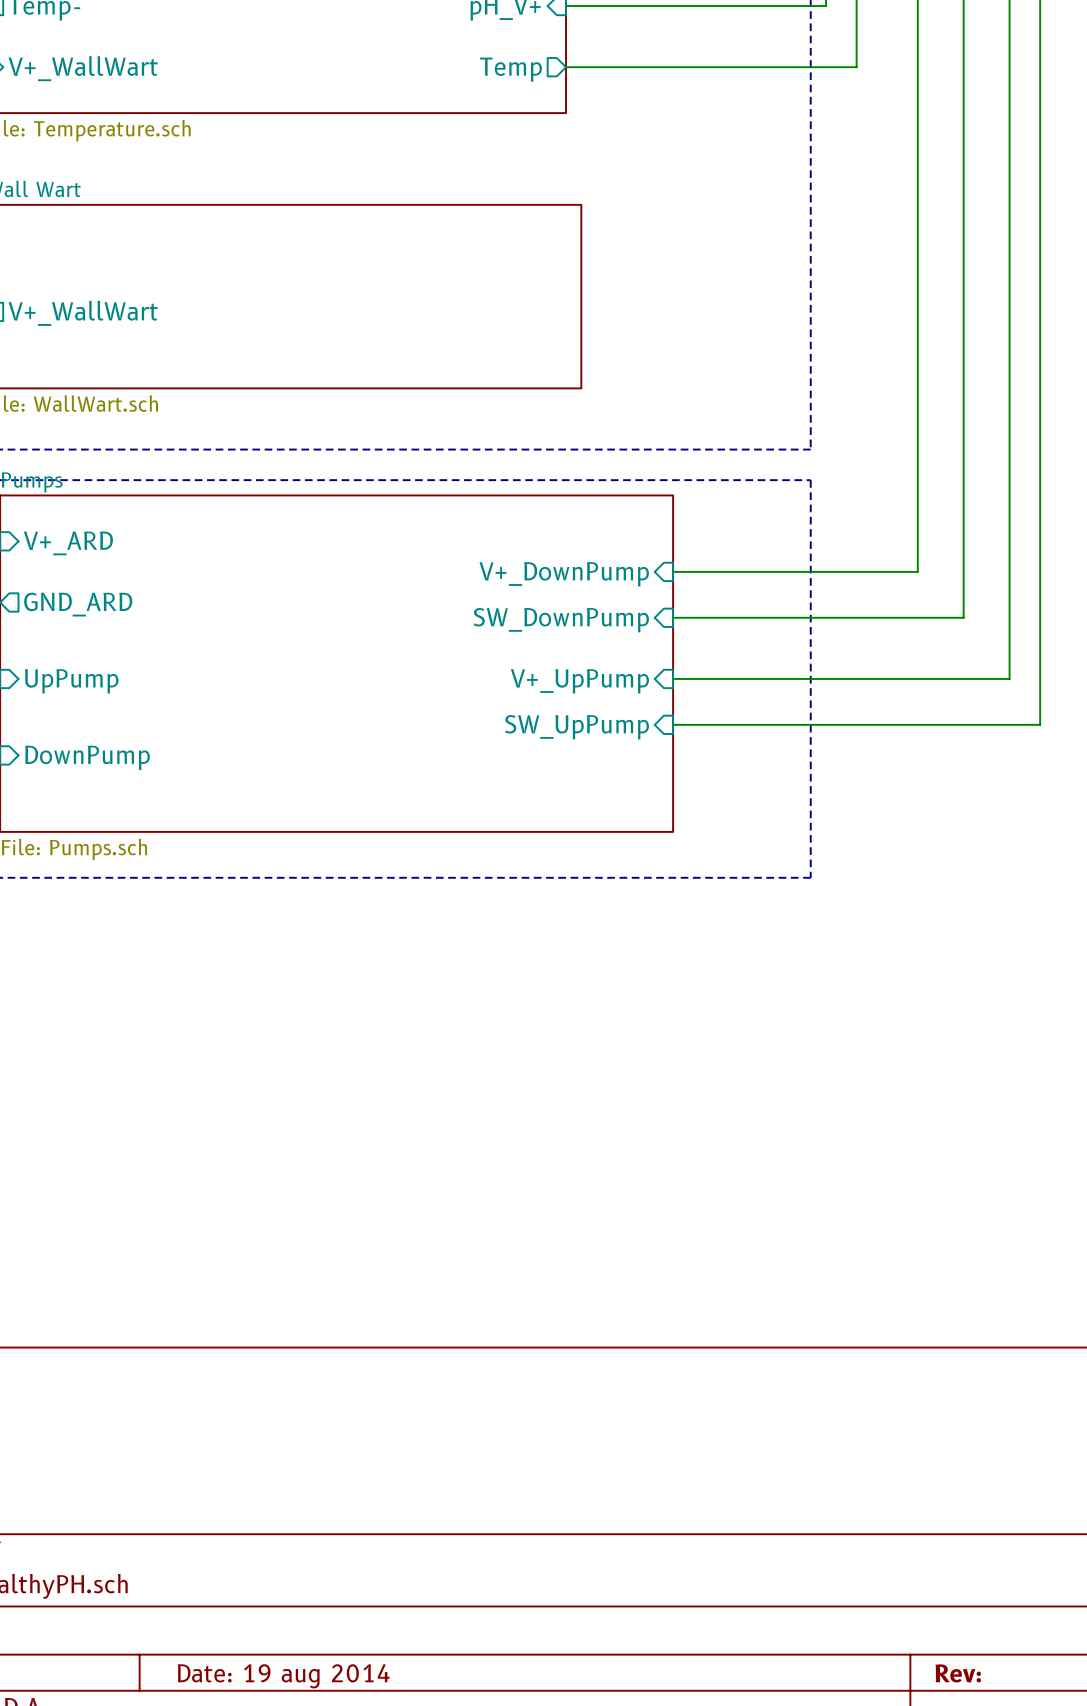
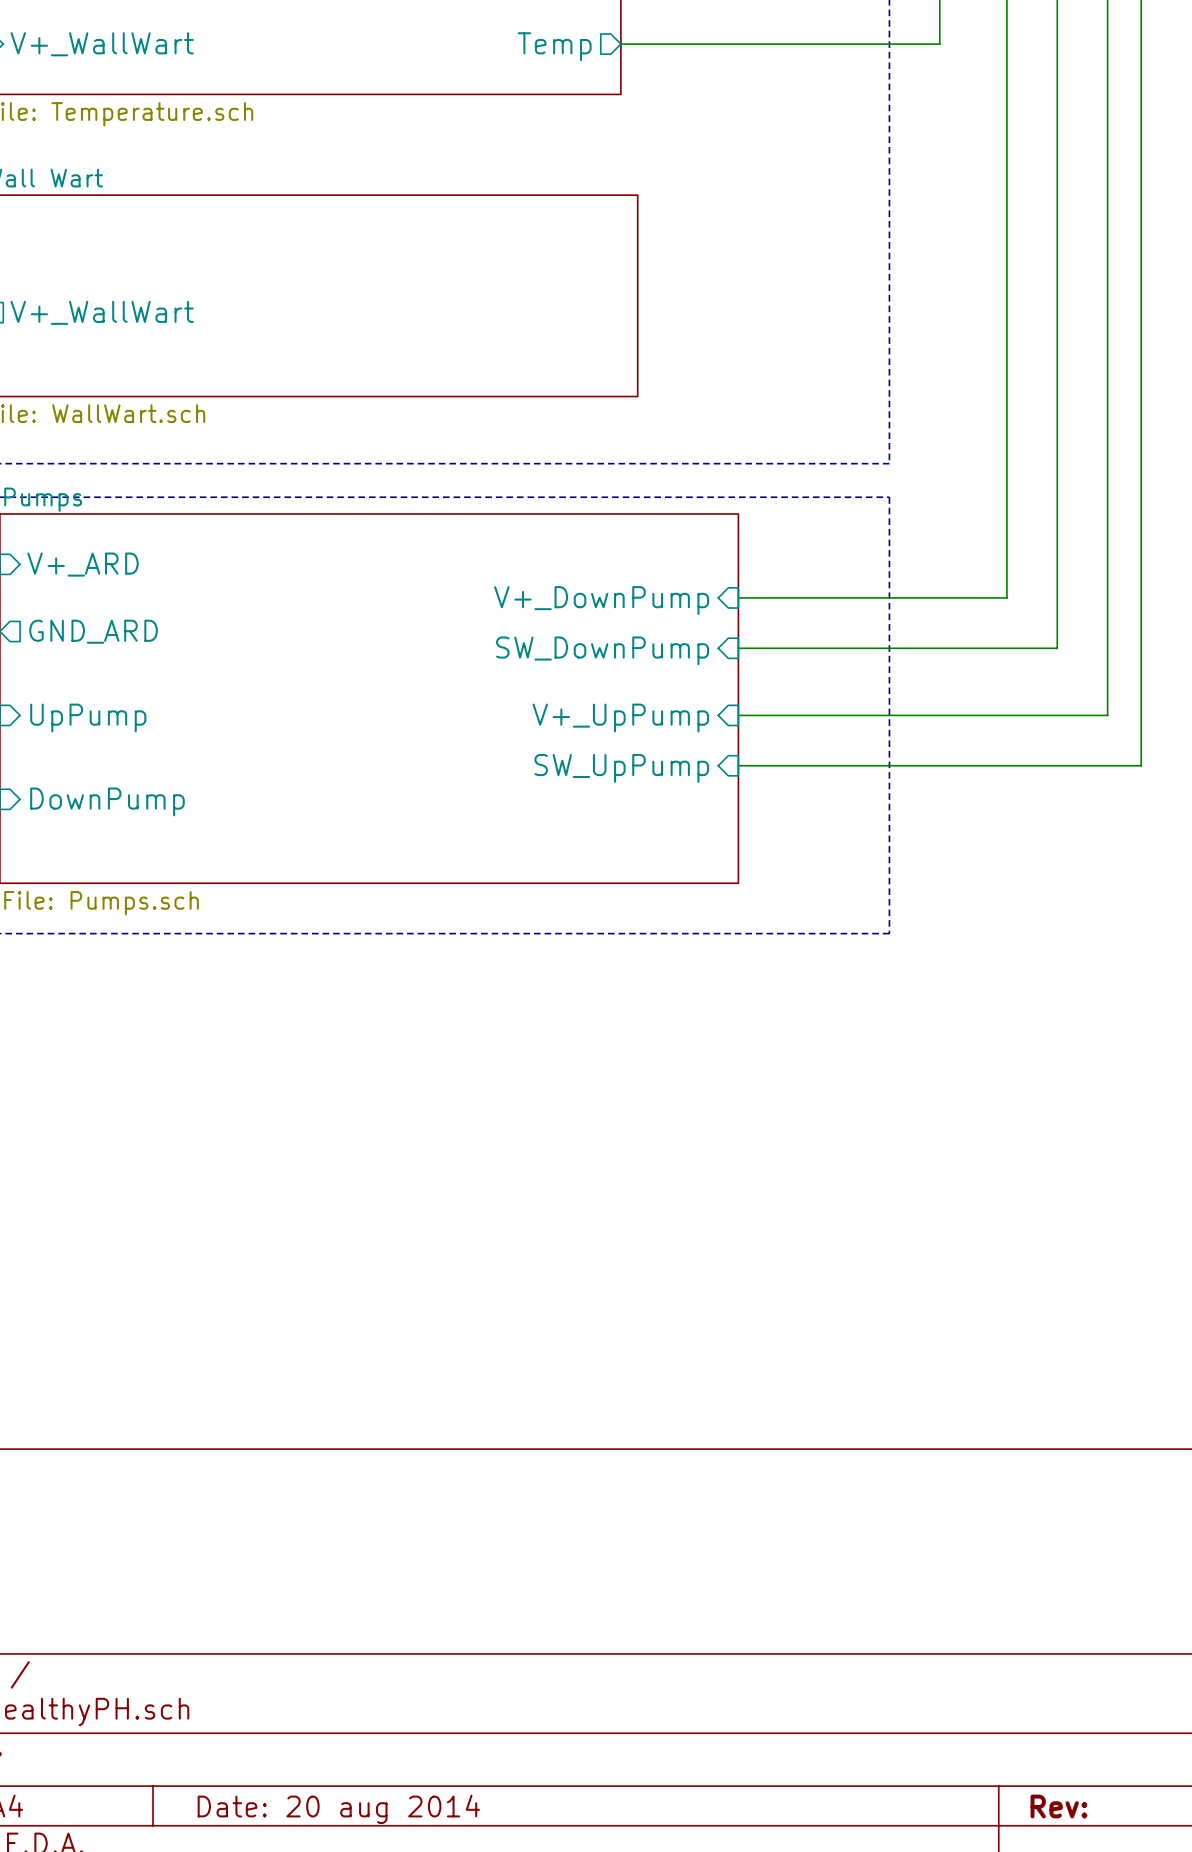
title block: Date: 19 aug 2014 (283, 1676) -> Date: 20 aug 2014 (338, 1809)

